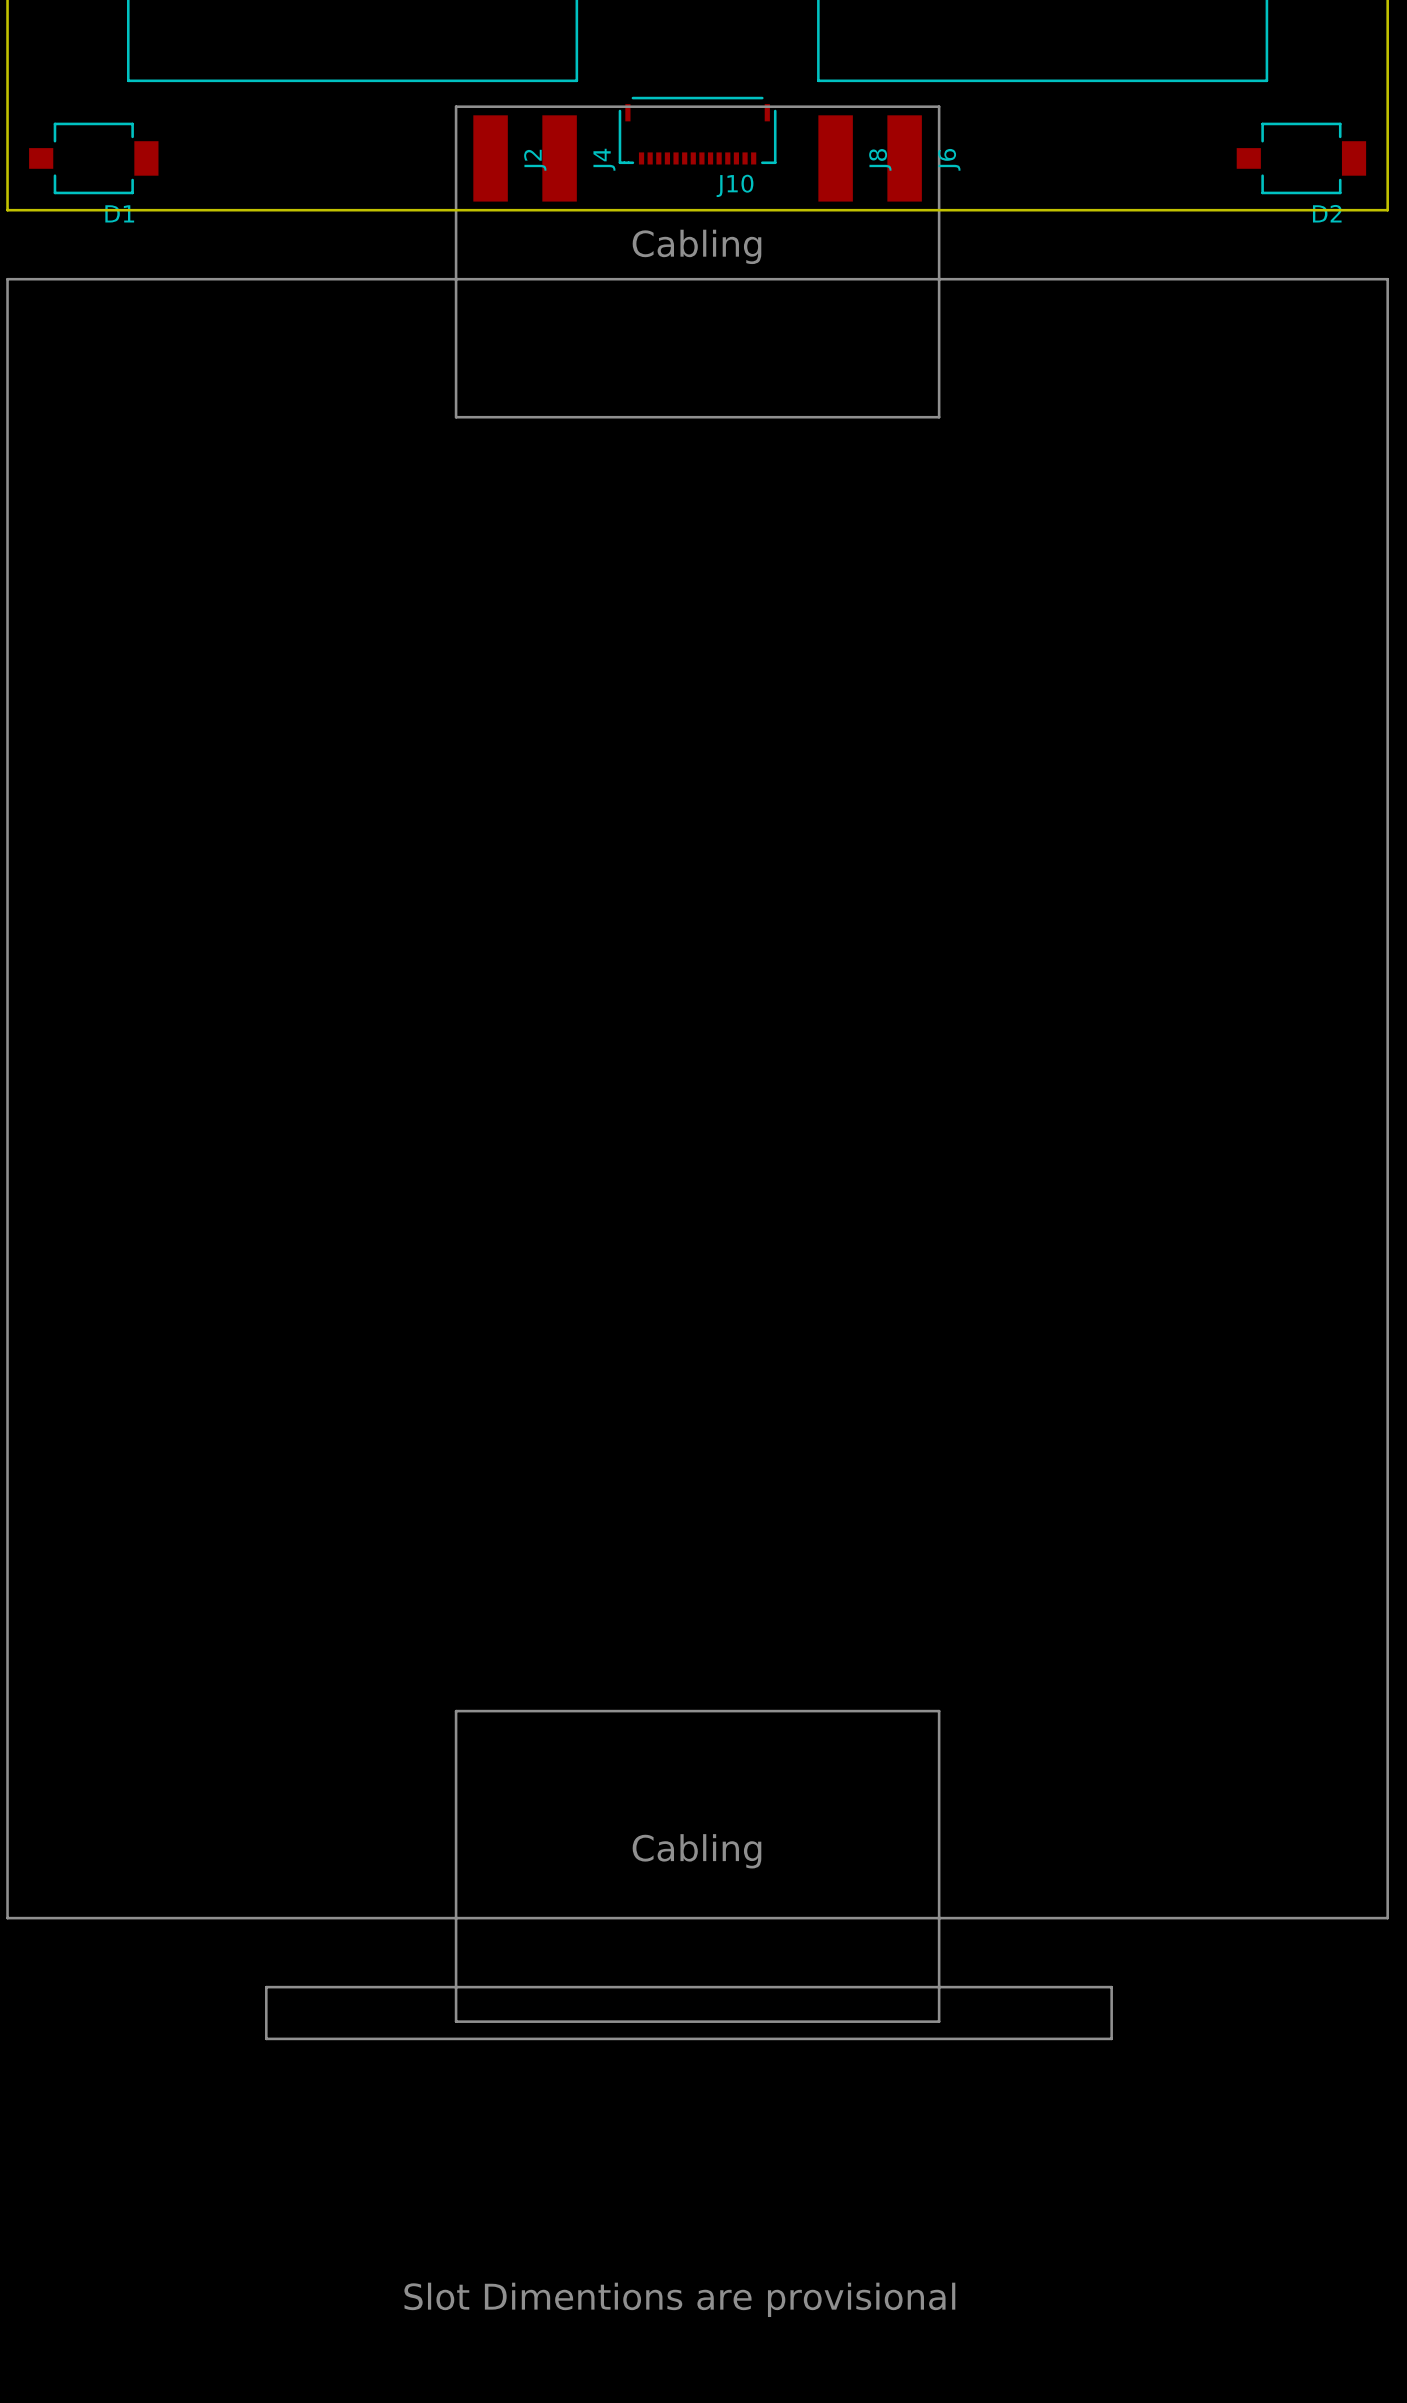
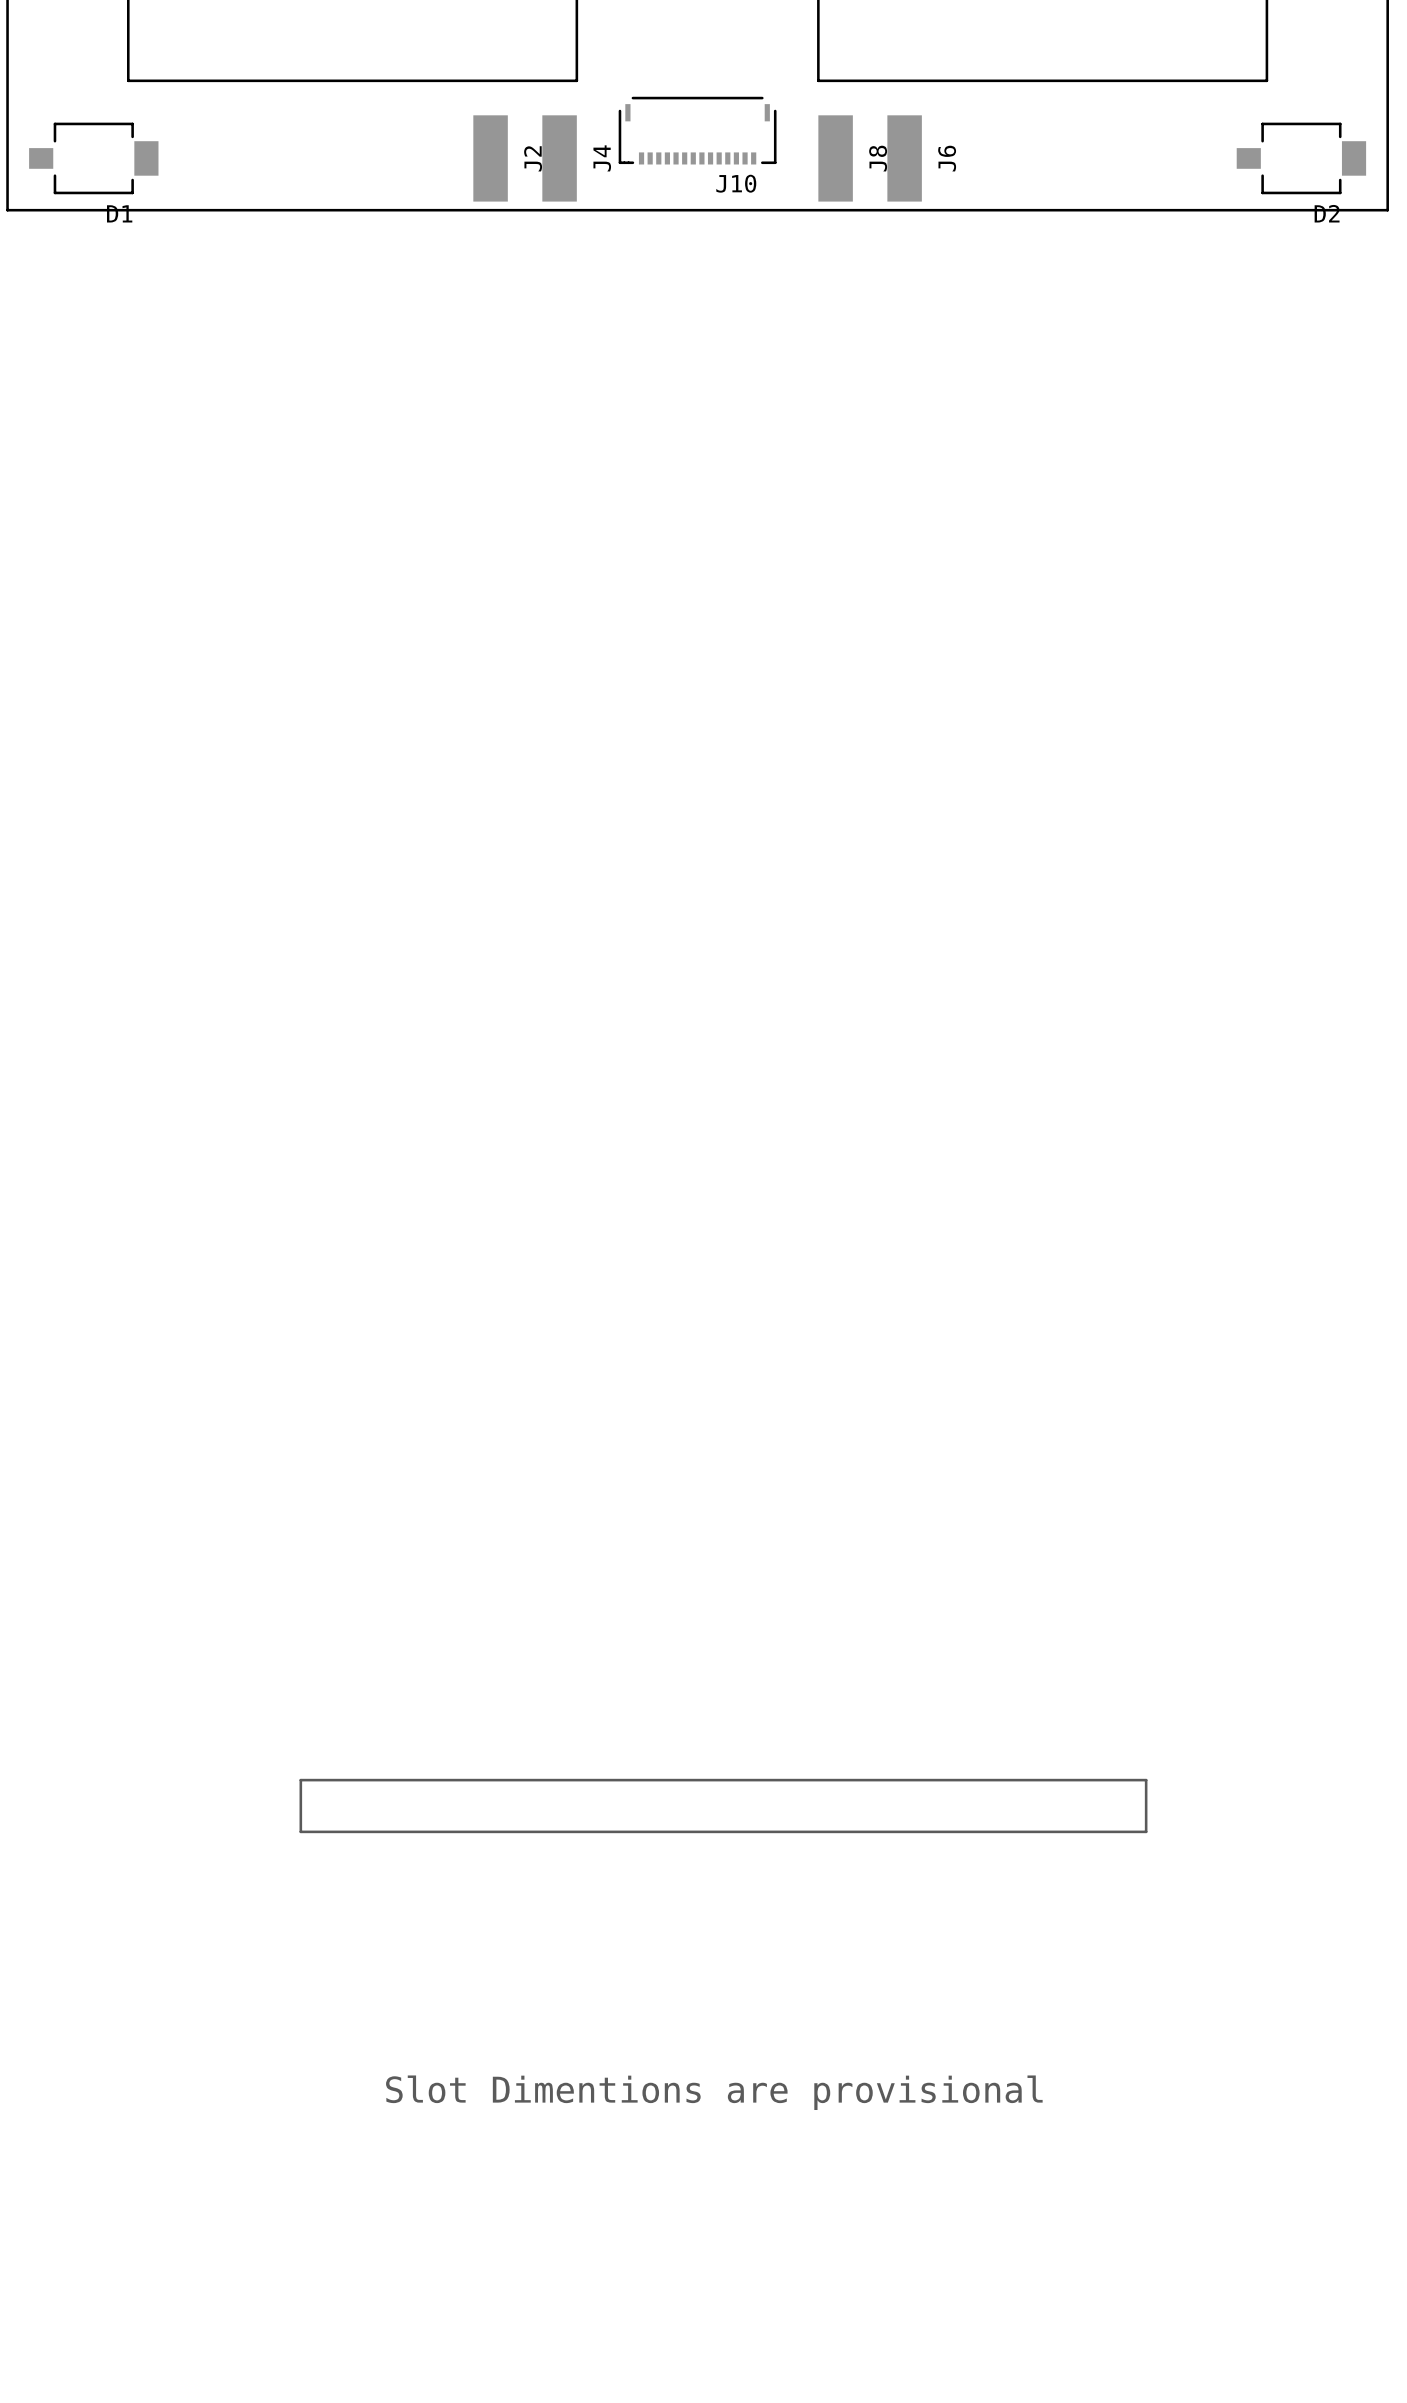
line: (456, 106) (456, 417) (939, 417) (939, 106) (456, 106) -> none
text: Cabling (696, 246) -> none
line: (7, 279) (7, 1918) (1387, 1918) (1387, 279) (7, 279) -> none
line: (456, 1711) (939, 1711) (939, 2021) (456, 2021) (456, 1711) -> none
text: Cabling (696, 1851) -> none
line: (266, 1987) (266, 2038) (1111, 2038) (1111, 1987) (266, 1987) -> (300, 1780) (300, 1831) (1146, 1831) (1146, 1780) (300, 1780)
text position: Slot Dimentions are provisional (679, 2299) -> Slot Dimentions are provisional (714, 2092)

